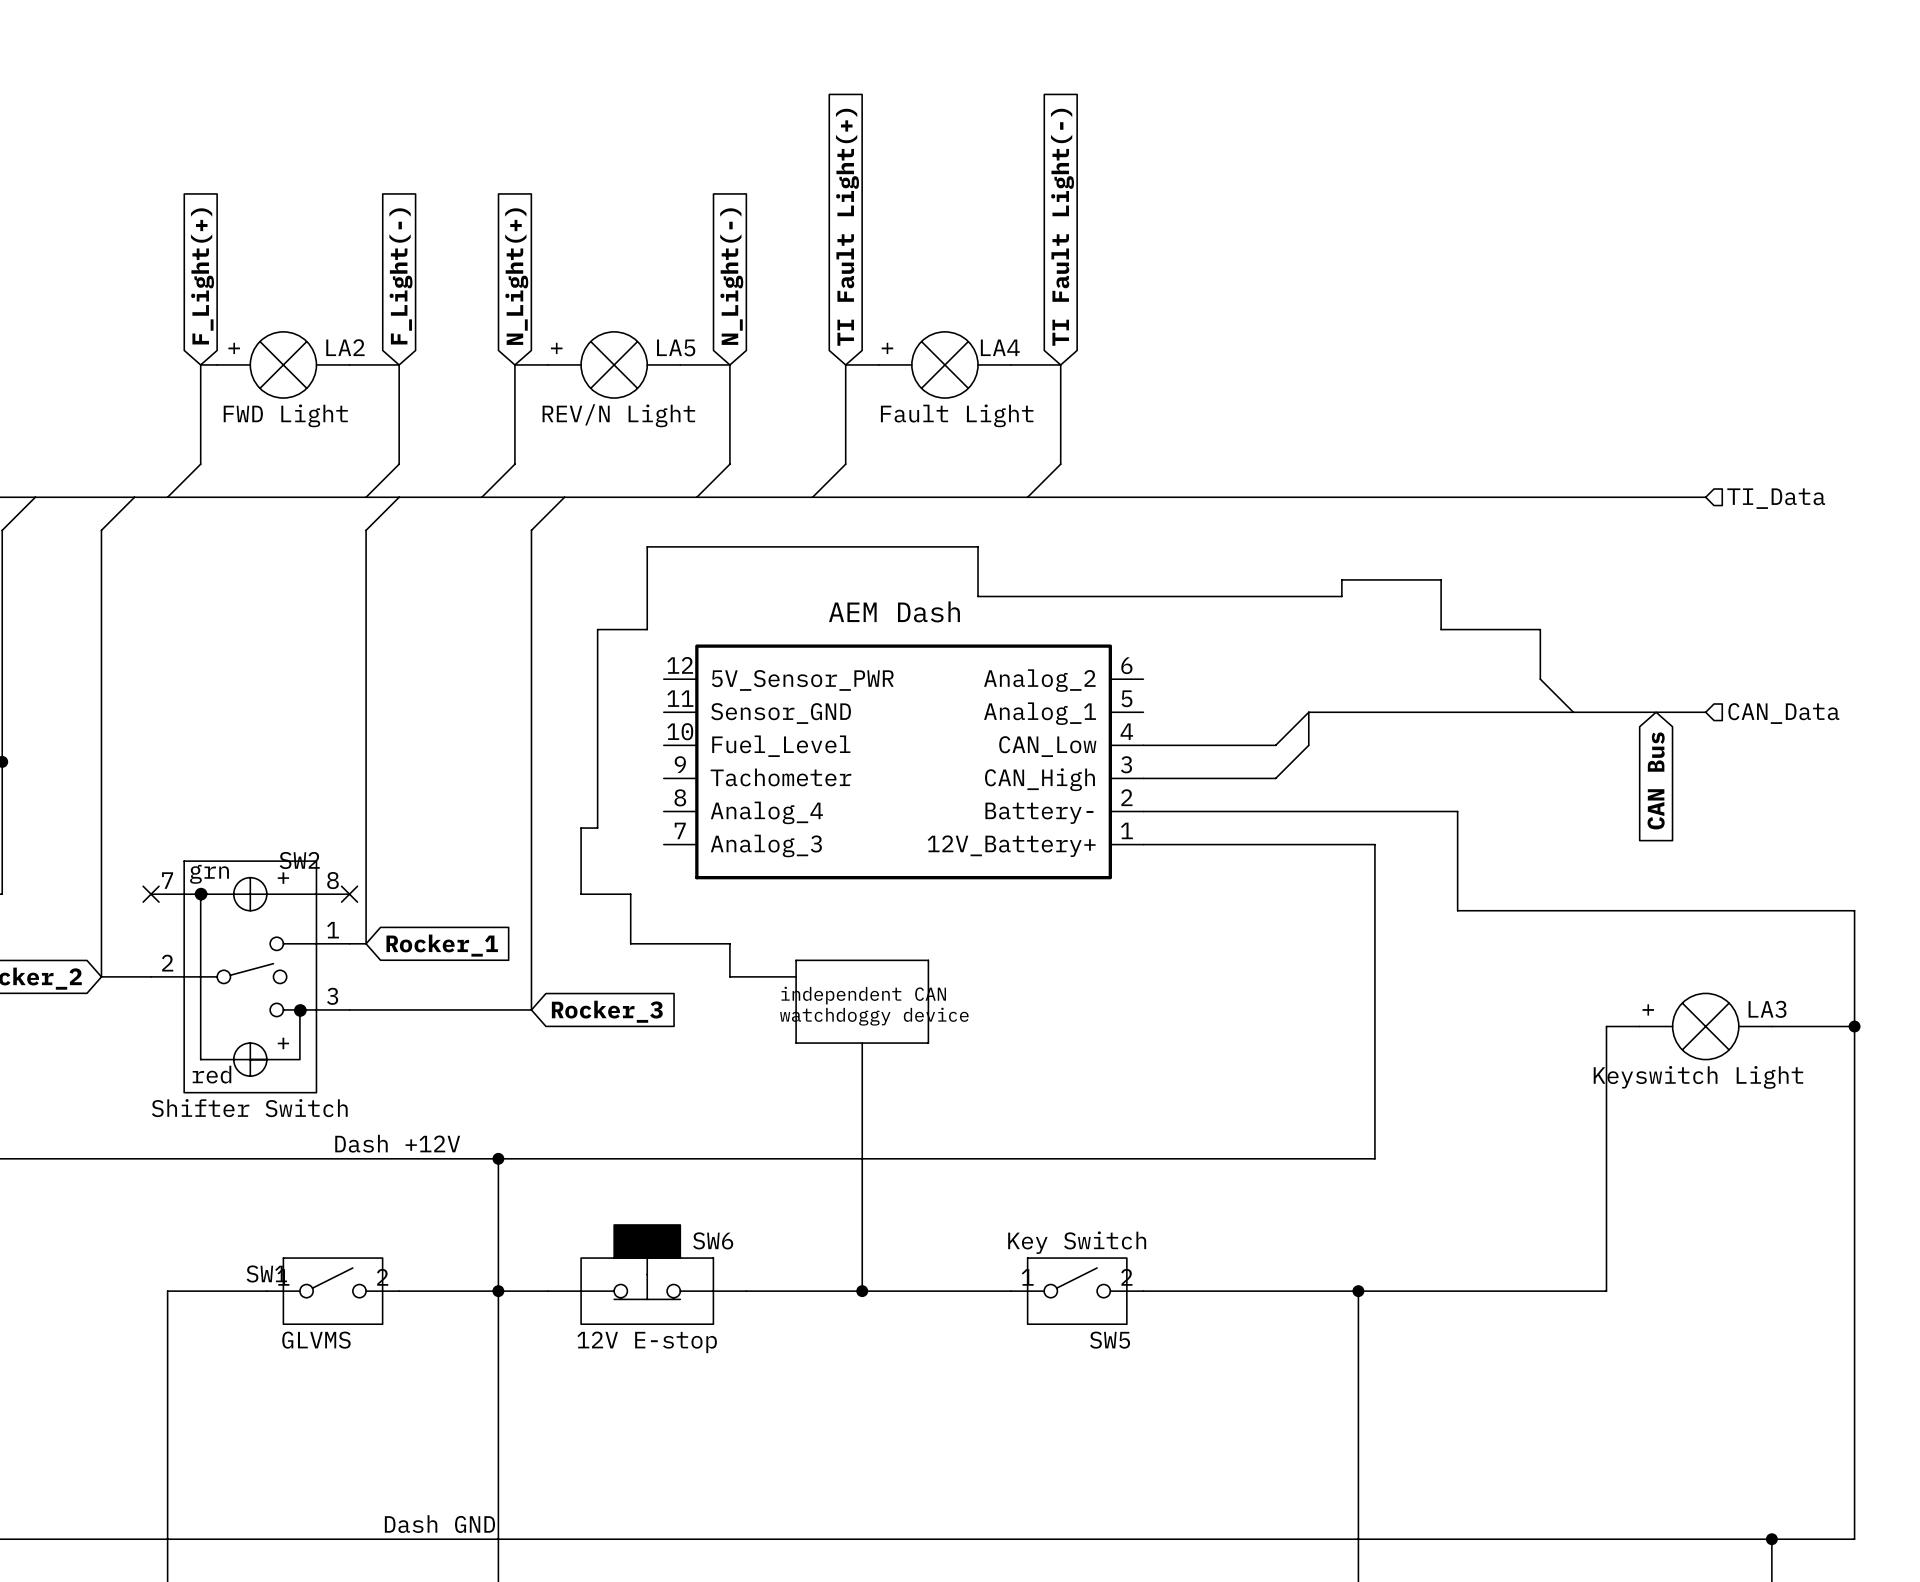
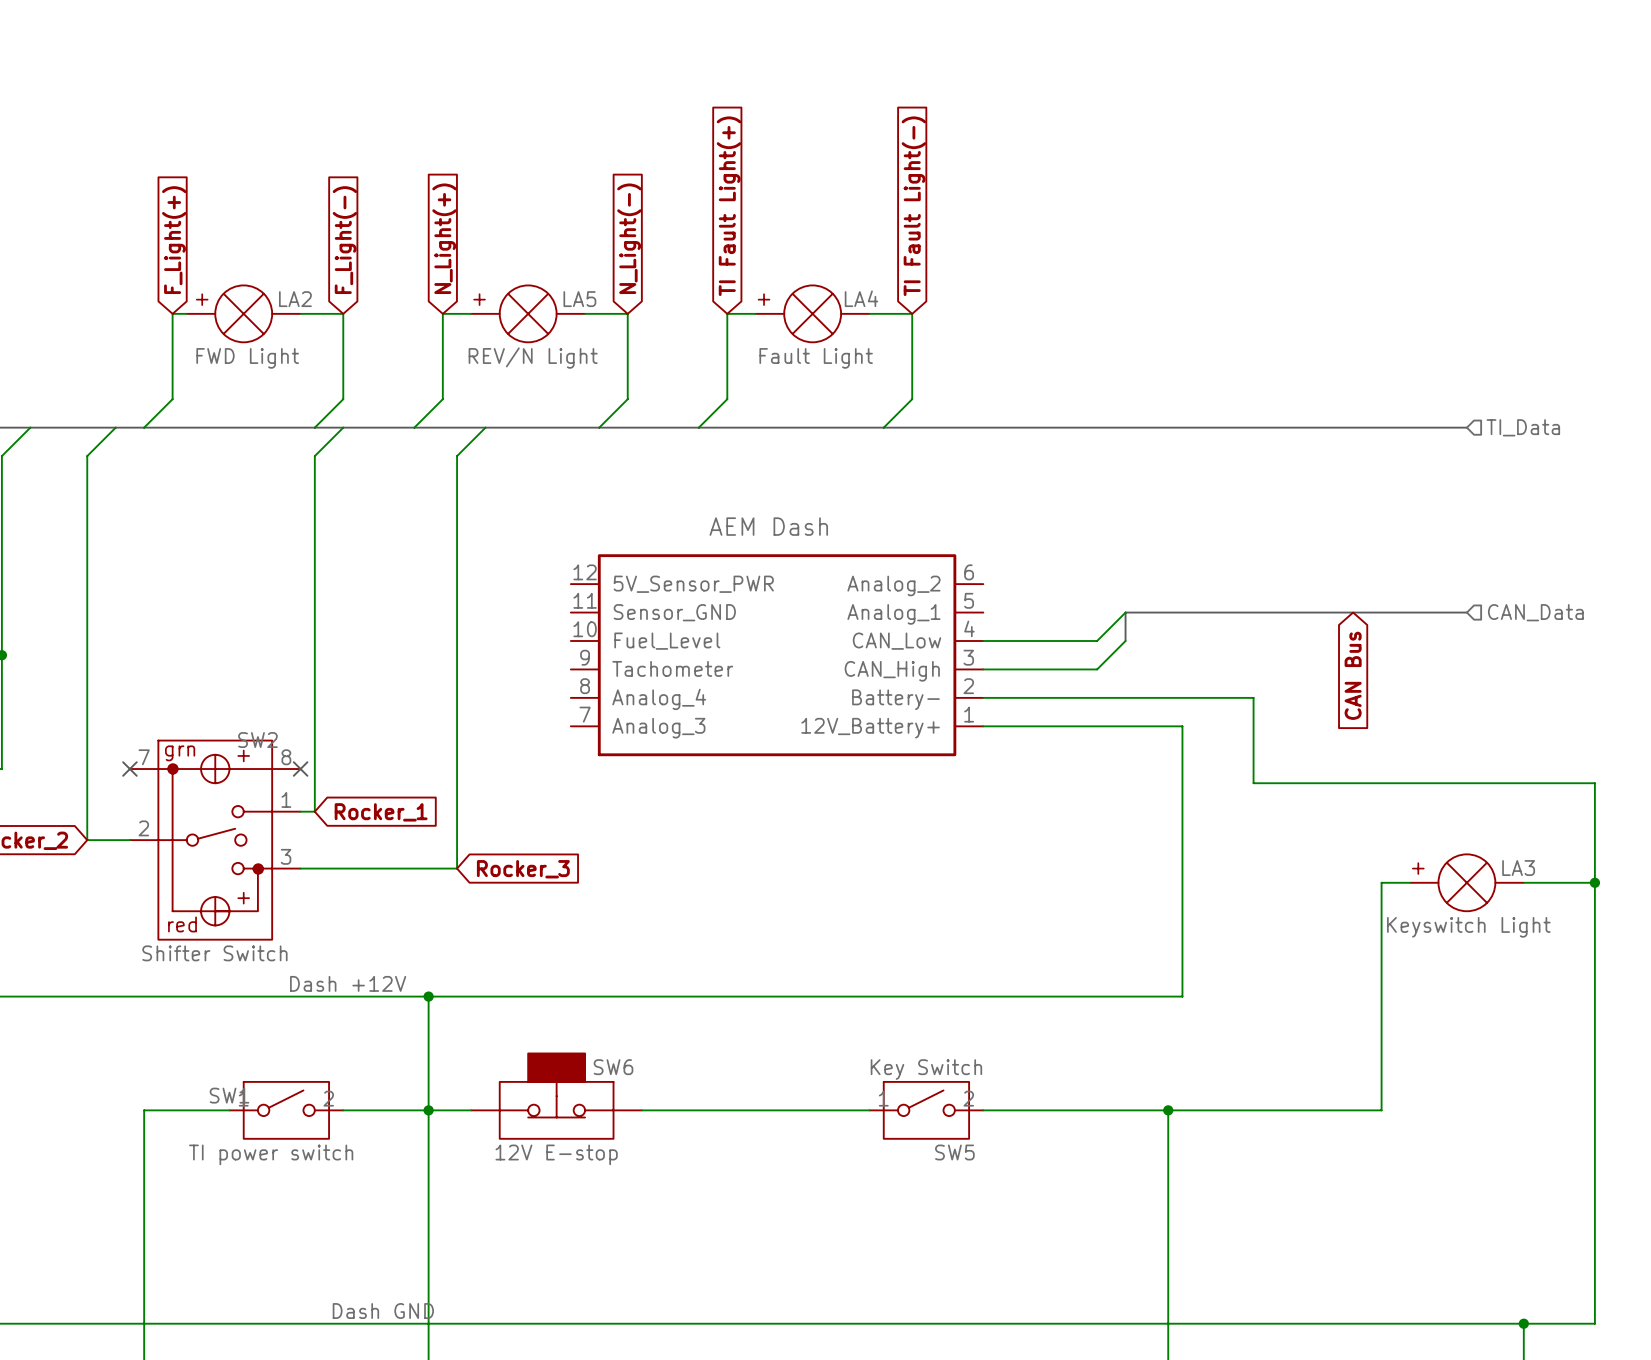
wire: (1573, 712) (1540, 679) (1540, 629) (1441, 629) (1441, 579) (1341, 579) (1341, 596) (978, 596) (978, 546) (647, 546) (647, 629) (597, 629) (597, 828) (581, 828) (581, 894) (630, 894) (630, 943) (729, 943) (729, 976) (796, 976) -> none
global label position: CAN Bus (1656, 780) -> CAN Bus (1353, 675)
line: (796, 960) (928, 960) (928, 1043) (796, 1043) (796, 960) -> none
text: independent CAN (863, 995) -> none
text: watchdoggy device (874, 1016) -> none
wire: (862, 1043) (862, 1291) -> none
junction: (862, 1291) -> none
SW1 value: GLVMS (316, 1340) -> TI power switch (271, 1154)

